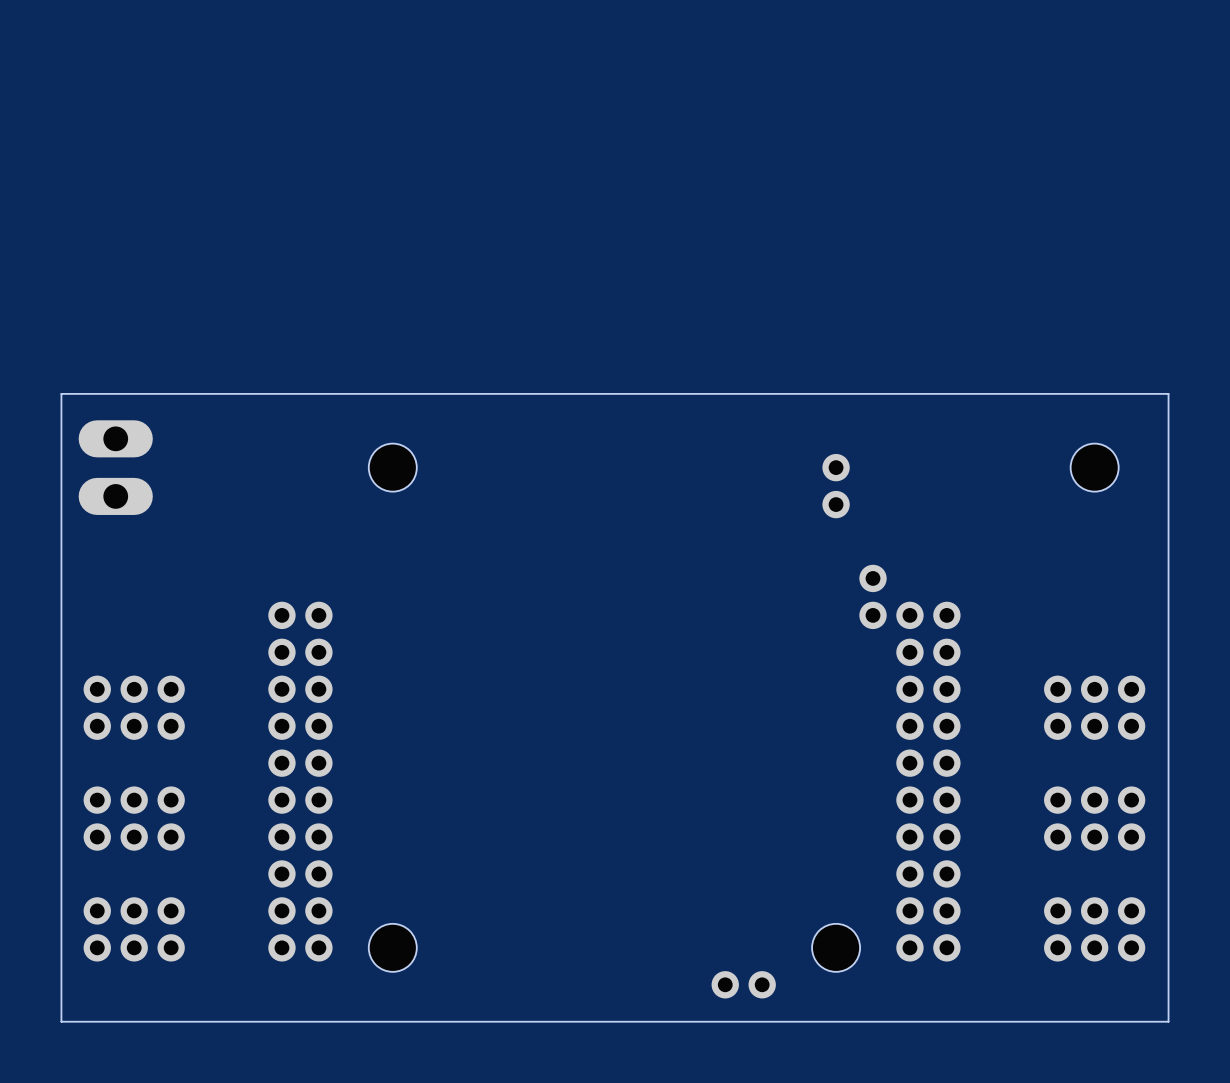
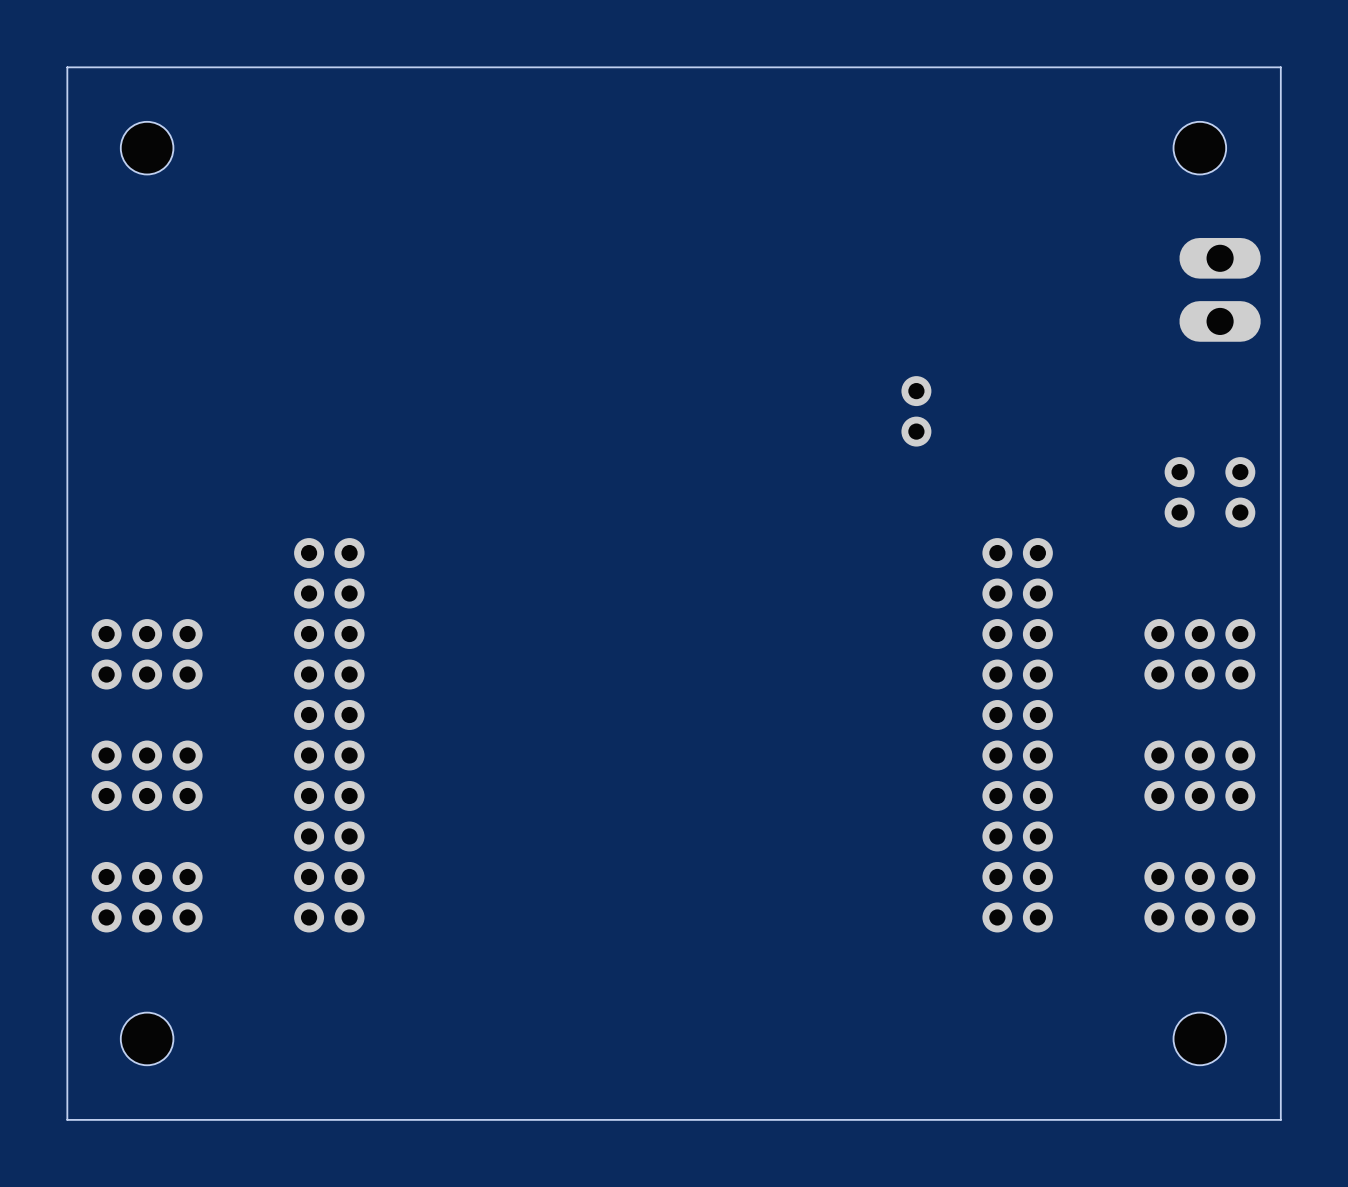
part: none -> (147, 148)
part: none -> (1220, 289)
board edge: (1168, 393) (61, 393) -> (1280, 431) (1280, 67) (67, 67) (67, 431)
part: none -> (1179, 492)
part: none -> (1240, 492)
part: (115, 467) -> none
part: (392, 467) -> none
part position: (1094, 467) -> (1199, 148)
part position: (836, 486) -> (916, 411)
part: none -> (147, 634)
part: none -> (1199, 634)
part: (873, 596) -> none
part: none -> (147, 674)
part: none -> (1199, 674)
part: none -> (309, 735)
part: none -> (349, 735)
part: none -> (997, 735)
part: none -> (1037, 735)
part: (281, 781) -> none
part: (318, 781) -> none
part: (909, 781) -> none
part: (946, 781) -> none
part: (134, 910) -> none
part: (1094, 910) -> none
part footprint: [83, 934, 185, 962] -> [120, 1012, 174, 1066]
part footprint: [1044, 934, 1146, 962] -> [1173, 1012, 1227, 1066]
part: (392, 947) -> none
part: (836, 947) -> none
part: (743, 984) -> none

